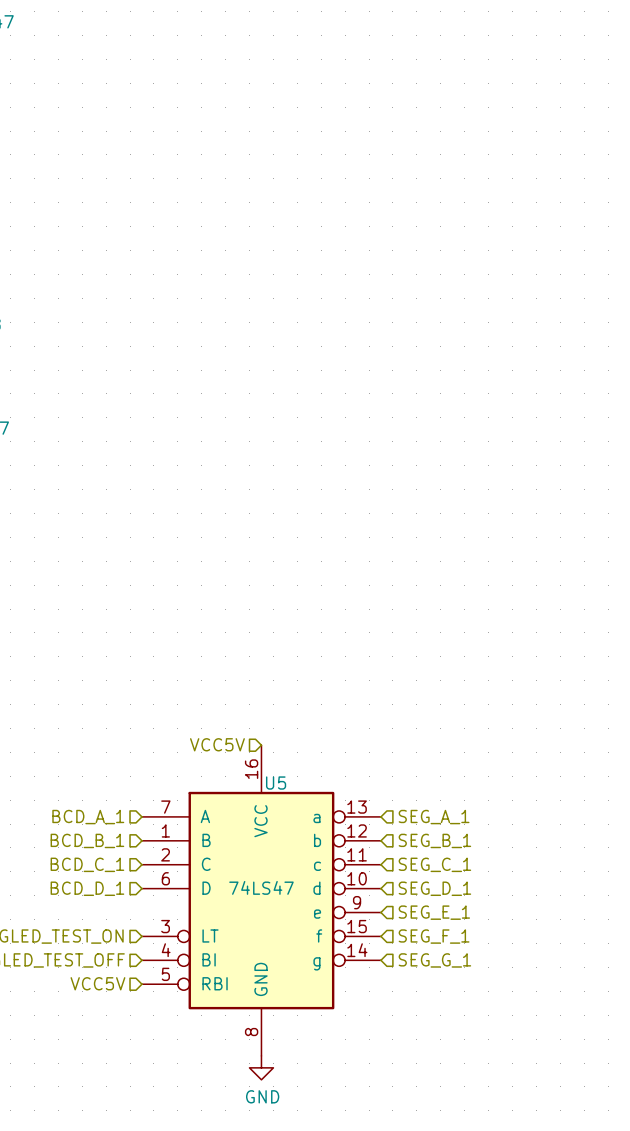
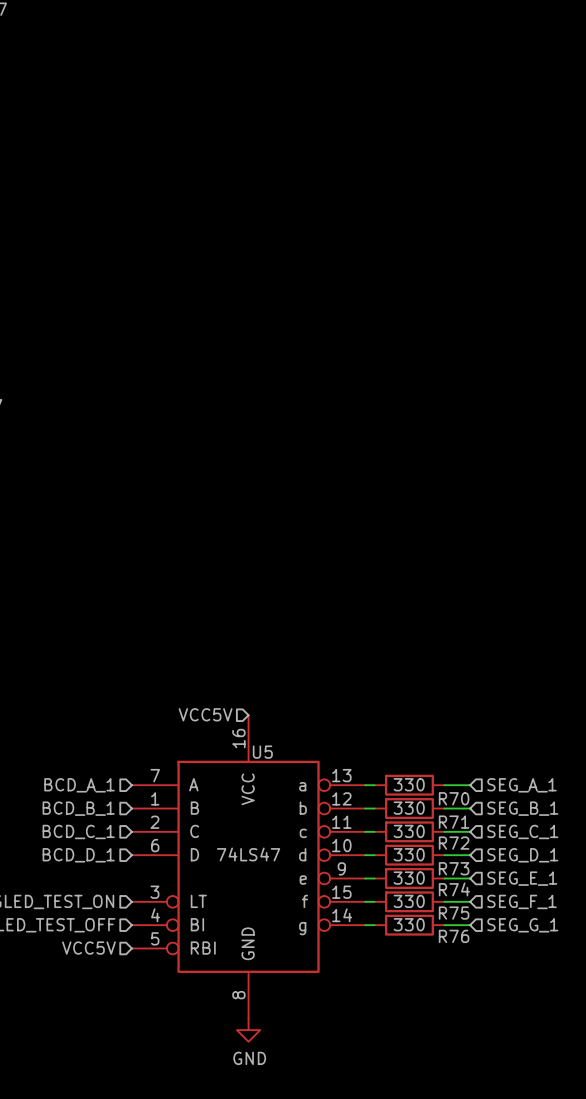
wire: none -> (365, 785) (374, 785)
R70: none -> 330 (409, 785)
wire: none -> (444, 785) (470, 785)
hierarchical label position: SEG_A_1 (434, 817) -> SEG_A_1 (521, 785)
wire: none -> (365, 808) (374, 808)
R71: none -> 330 (409, 808)
hierarchical label position: SEG_B_1 (434, 840) -> SEG_B_1 (522, 808)
wire: none -> (444, 808) (470, 808)
wire: none -> (365, 831) (374, 831)
R72: none -> 330 (409, 831)
hierarchical label position: SEG_C_1 (434, 864) -> SEG_C_1 (522, 831)
wire: none -> (444, 831) (470, 831)
wire: none -> (365, 855) (374, 855)
R73: none -> 330 (409, 855)
hierarchical label position: SEG_D_1 (434, 888) -> SEG_D_1 (522, 855)
wire: none -> (444, 855) (470, 855)
wire: none -> (365, 878) (374, 878)
R74: none -> 330 (409, 878)
hierarchical label position: SEG_E_1 (434, 912) -> SEG_E_1 (522, 878)
wire: none -> (444, 878) (470, 878)
wire: none -> (365, 901) (374, 901)
R75: none -> 330 (409, 901)
hierarchical label position: SEG_F_1 (434, 936) -> SEG_F_1 (521, 901)
wire: none -> (444, 901) (470, 901)
wire: none -> (365, 925) (374, 925)
R76: none -> 330 (409, 925)
hierarchical label position: SEG_G_1 (434, 960) -> SEG_G_1 (522, 925)
wire: none -> (444, 925) (470, 925)

